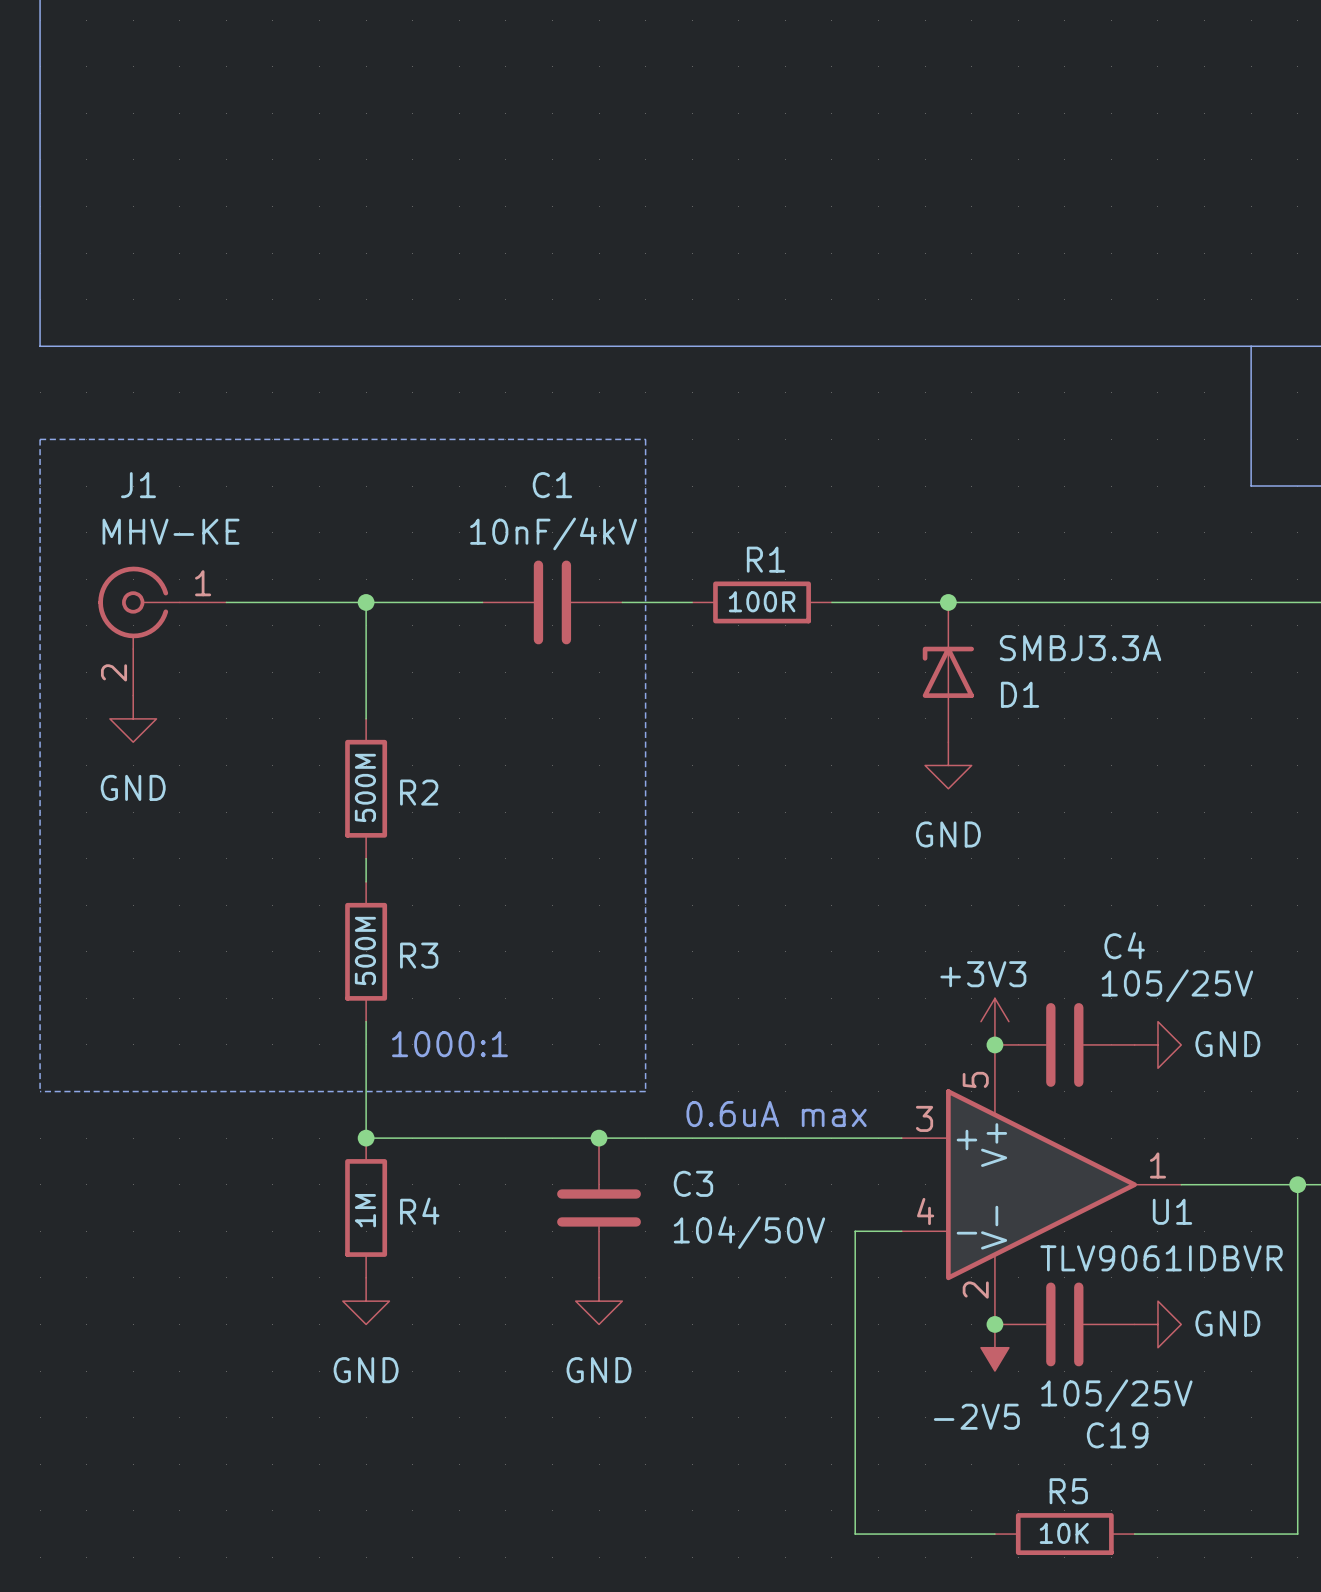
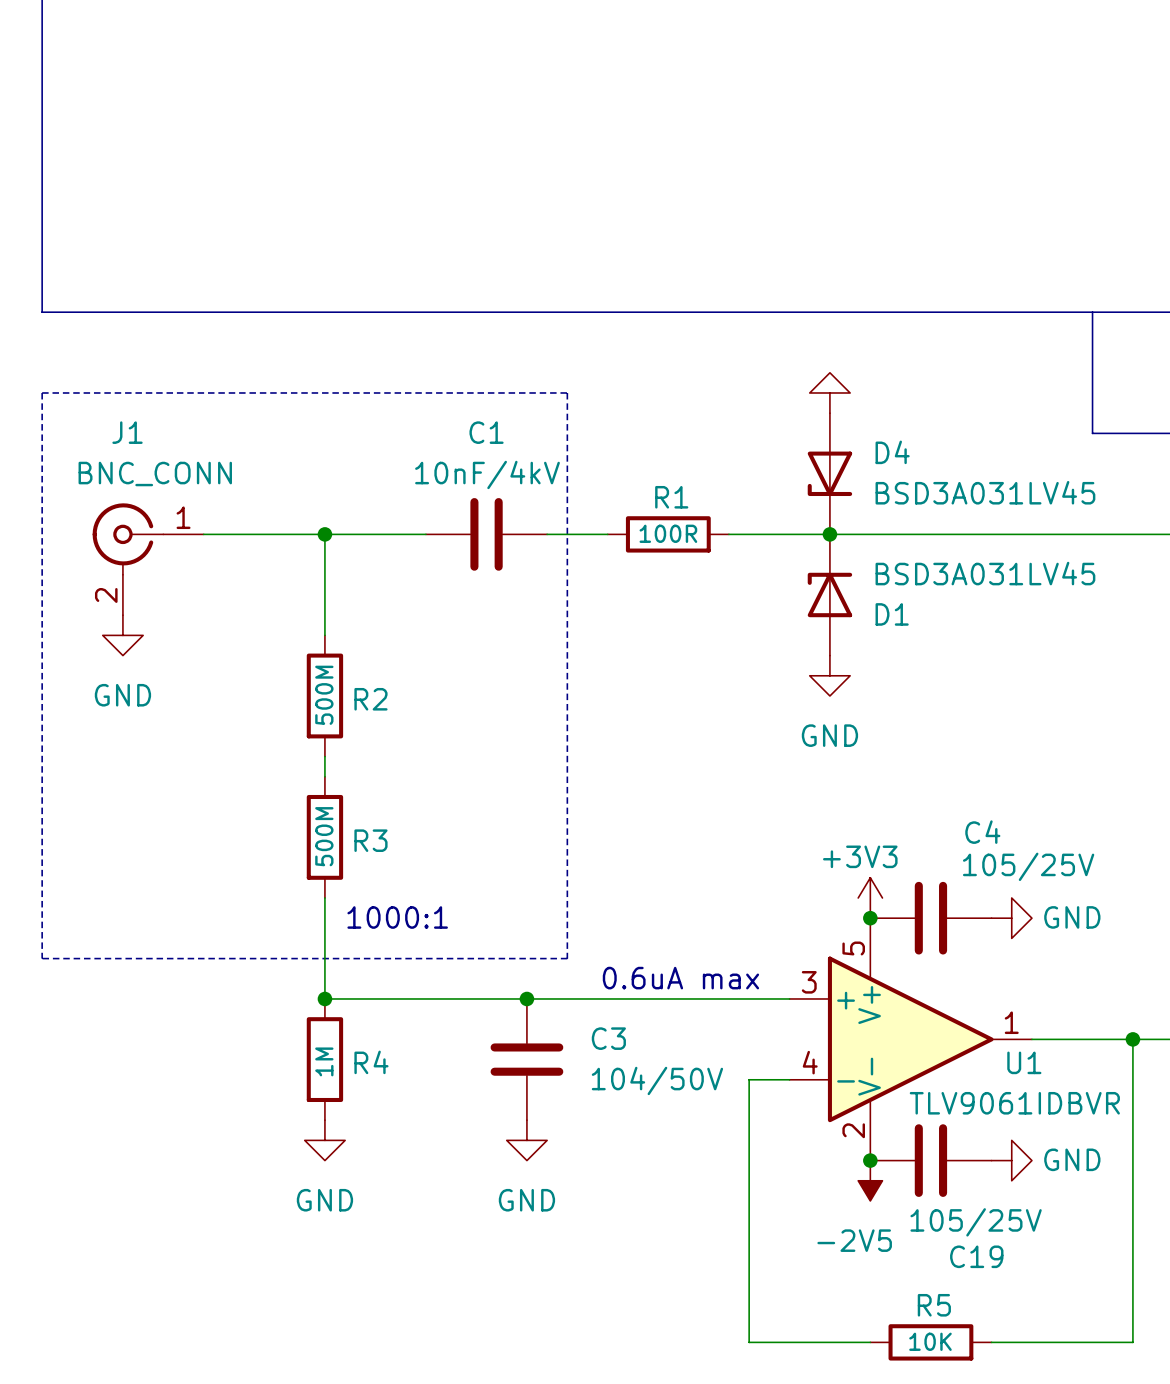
power symbol: none -> (829, 392)
J1 value: MHV-KE (171, 531) -> BNC_CONN (155, 474)
D4: none -> BSD3A031LV45 (829, 473)
D1 value: SMBJ3.3A (1080, 648) -> BSD3A031LV45 (985, 573)

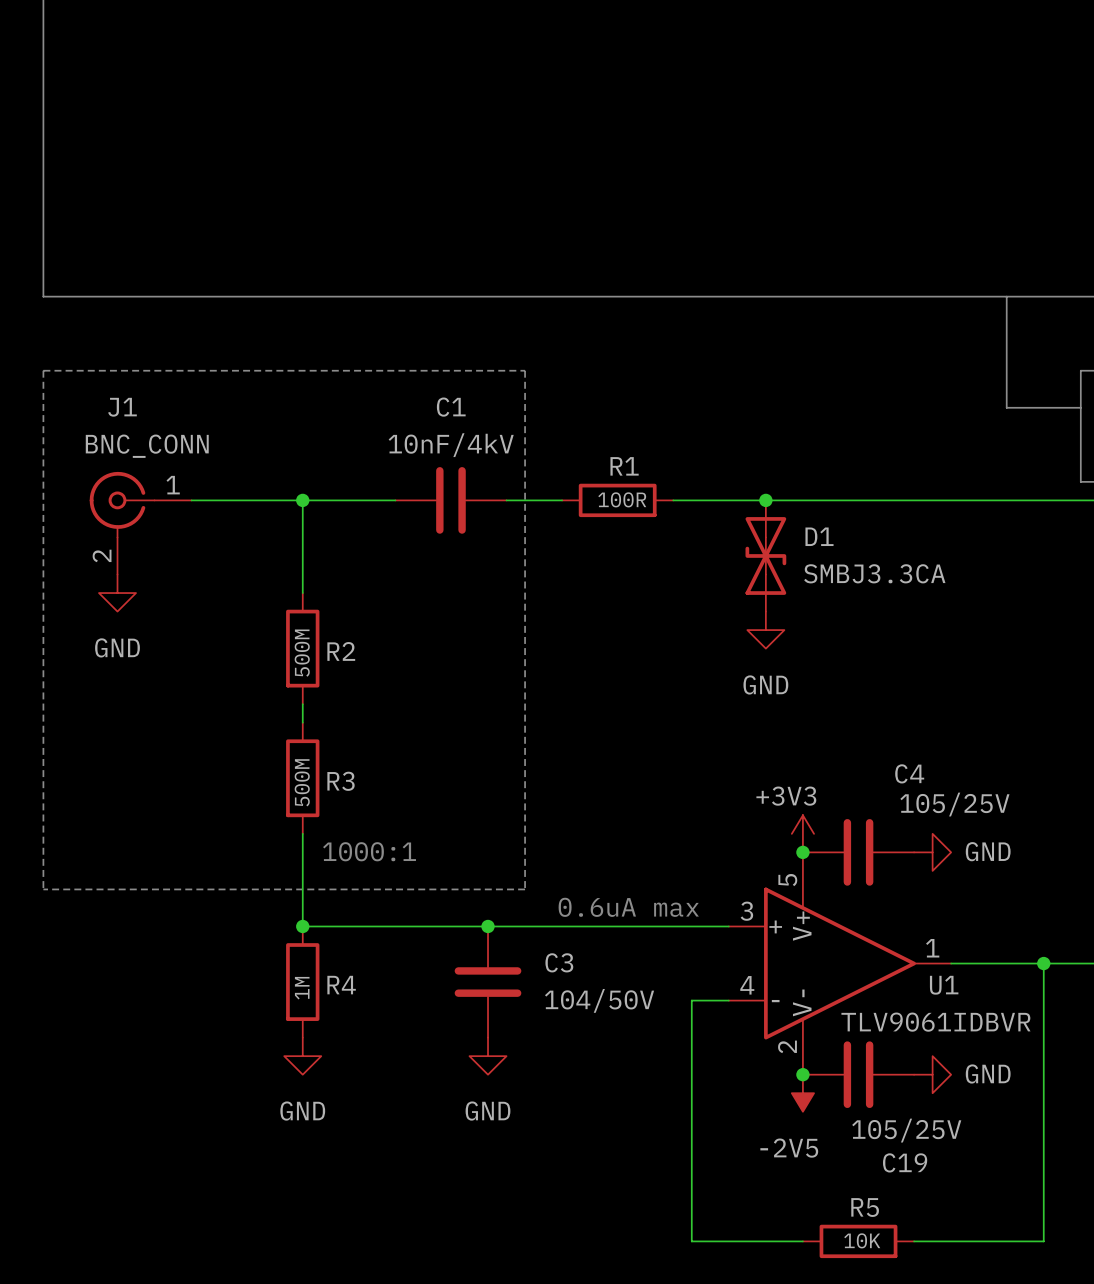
power symbol: (829, 392) -> none
D4: BSD3A031LV45 (829, 473) -> none
D1 symbol: [807, 534, 853, 656] -> [745, 500, 787, 612]
D1 value: BSD3A031LV45 (985, 573) -> SMBJ3.3CA (874, 573)
D1 name position: D1 (892, 614) -> D1 (819, 536)

